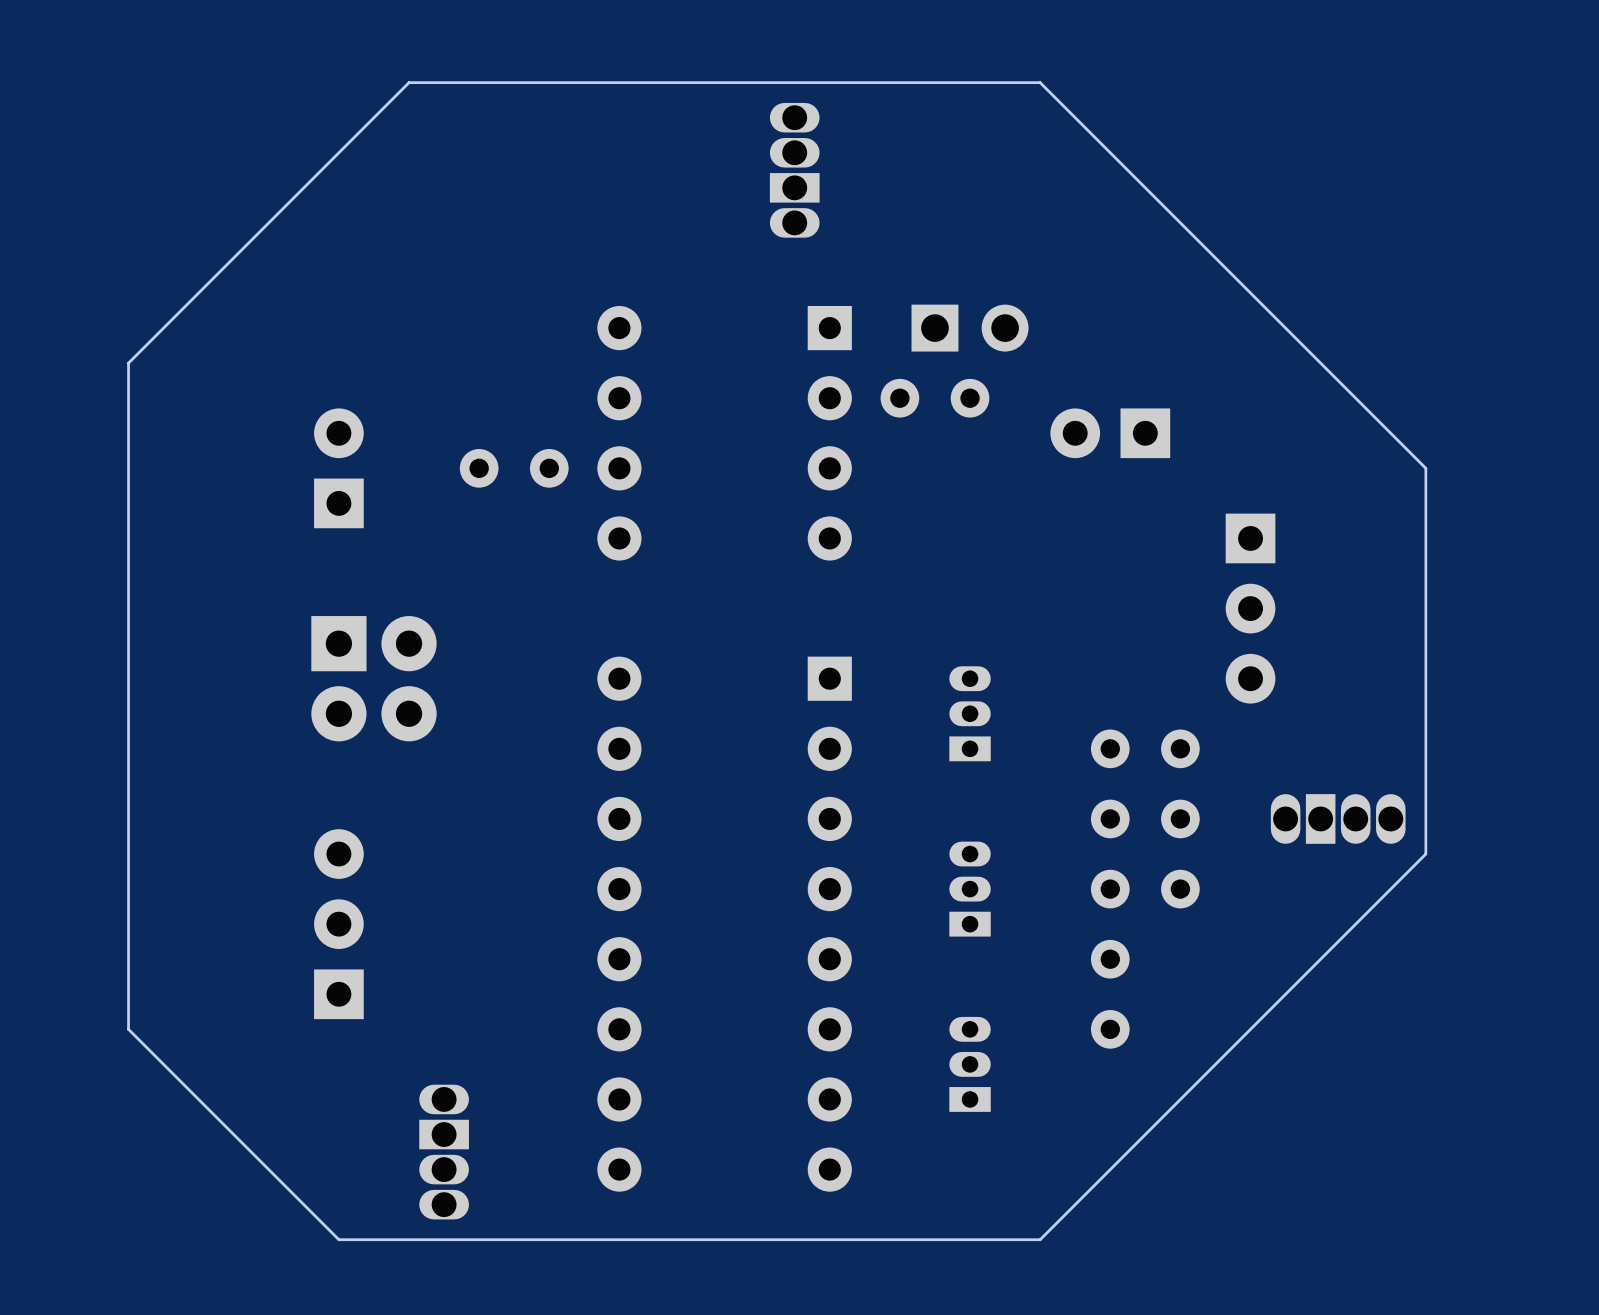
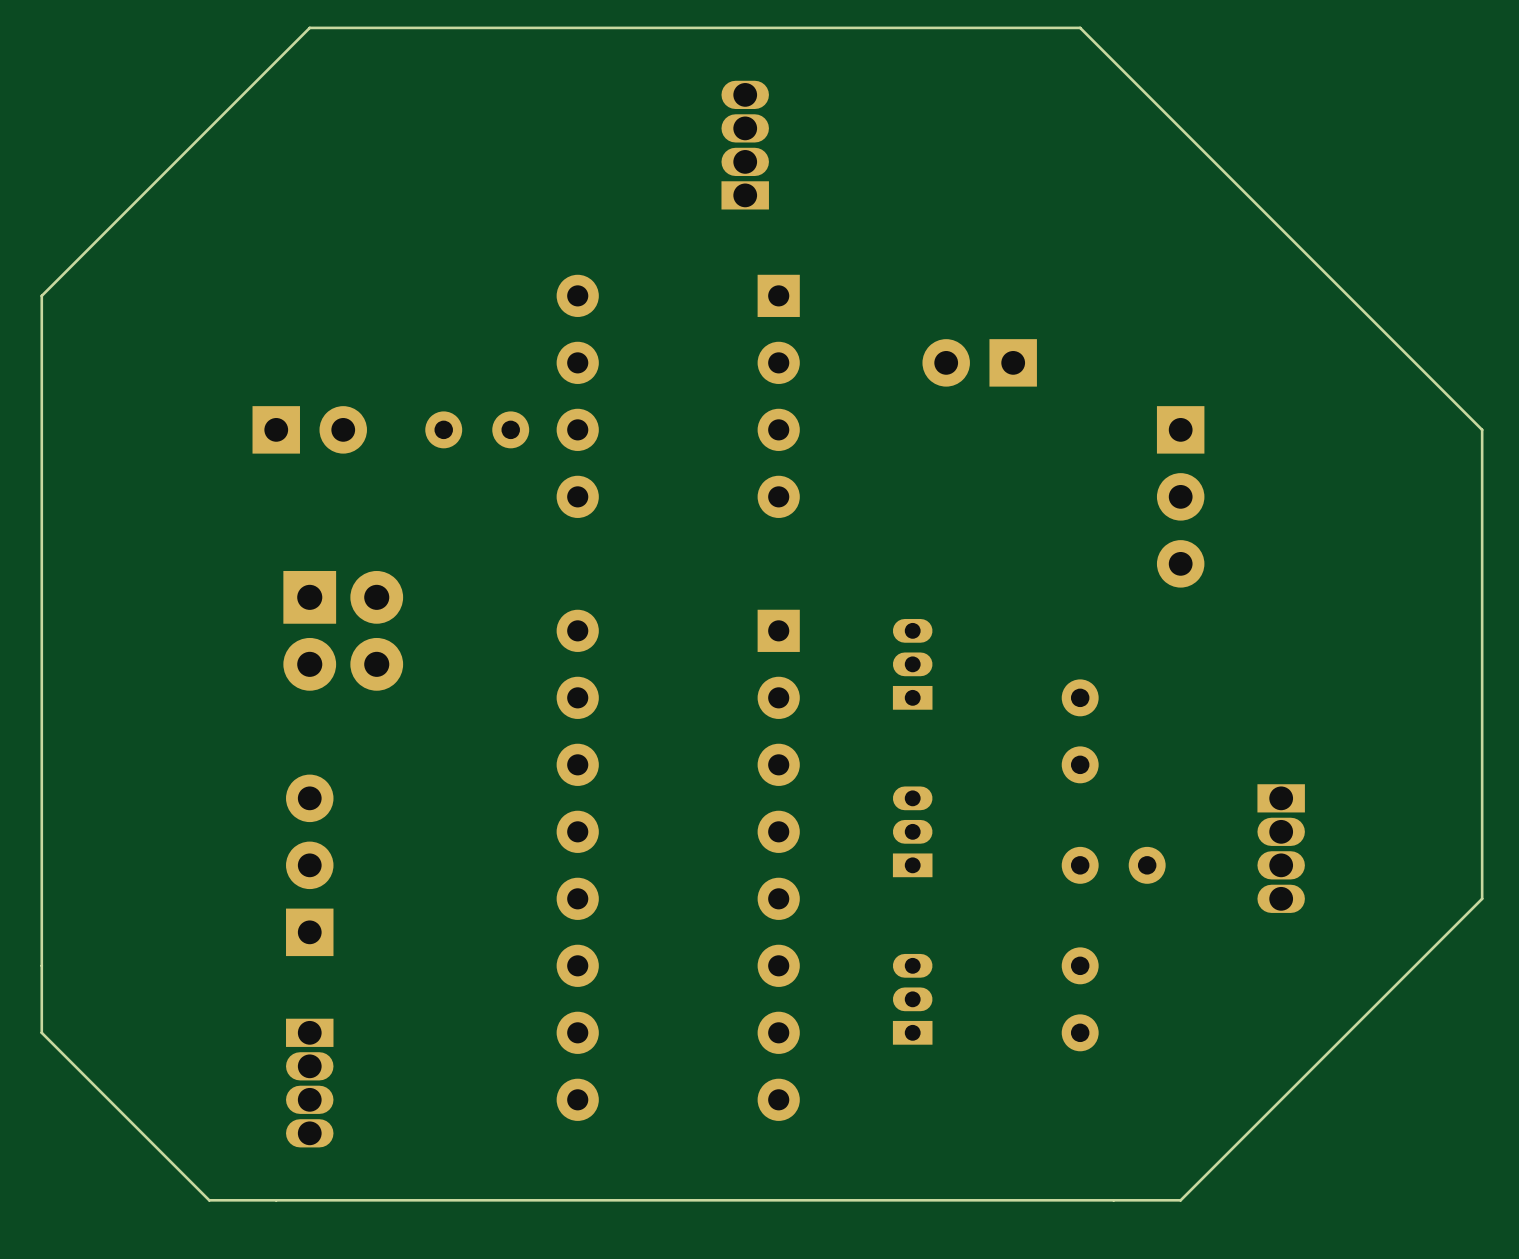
board edge: (1040, 82) (1425, 468) (1425, 854) (1040, 1239) (338, 1239) (128, 1029) (128, 363) (409, 82) (1040, 82) -> (1080, 27) (1482, 429) (1482, 898) (1180, 1200) (209, 1200) (41, 1032) (41, 295) (309, 27) (1080, 27)
part footprint: [769, 102, 820, 238] -> [721, 80, 769, 210]
part: (970, 328) -> none
part: (934, 398) -> none
part position: (1110, 433) -> (979, 362)
part rotation: 0° (338, 468) -> 90° clockwise (309, 429)
part position: (1250, 608) -> (1180, 496)
part: (1110, 783) -> none
part: none -> (1080, 731)
part: (1180, 783) -> none
part: (1338, 818) -> none
part: (1145, 889) -> none
part: none -> (1281, 848)
part: none -> (1113, 865)
part: (1110, 994) -> none
part: none -> (1080, 999)
part: none -> (309, 1083)
part: (444, 1152) -> none

